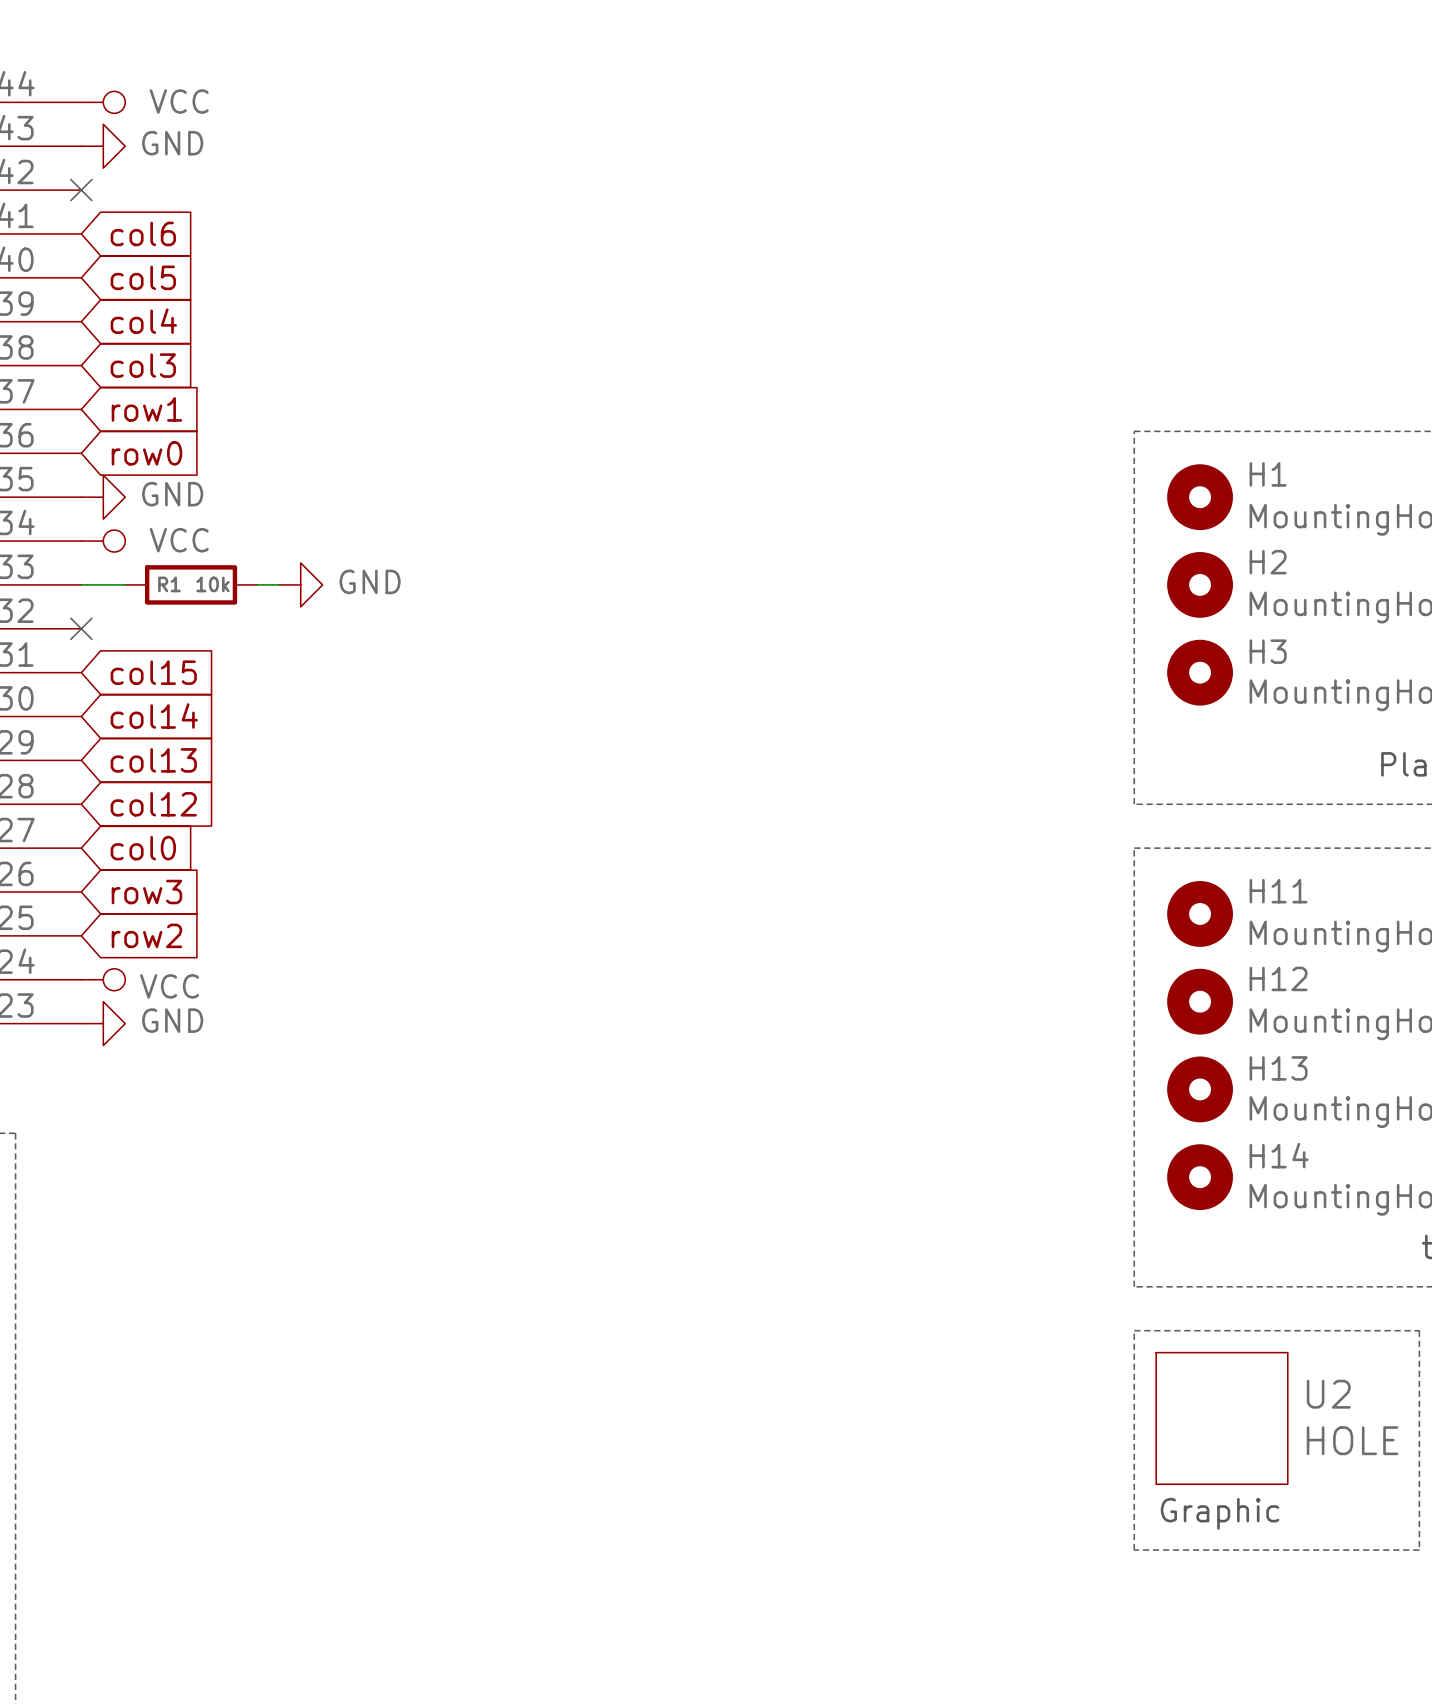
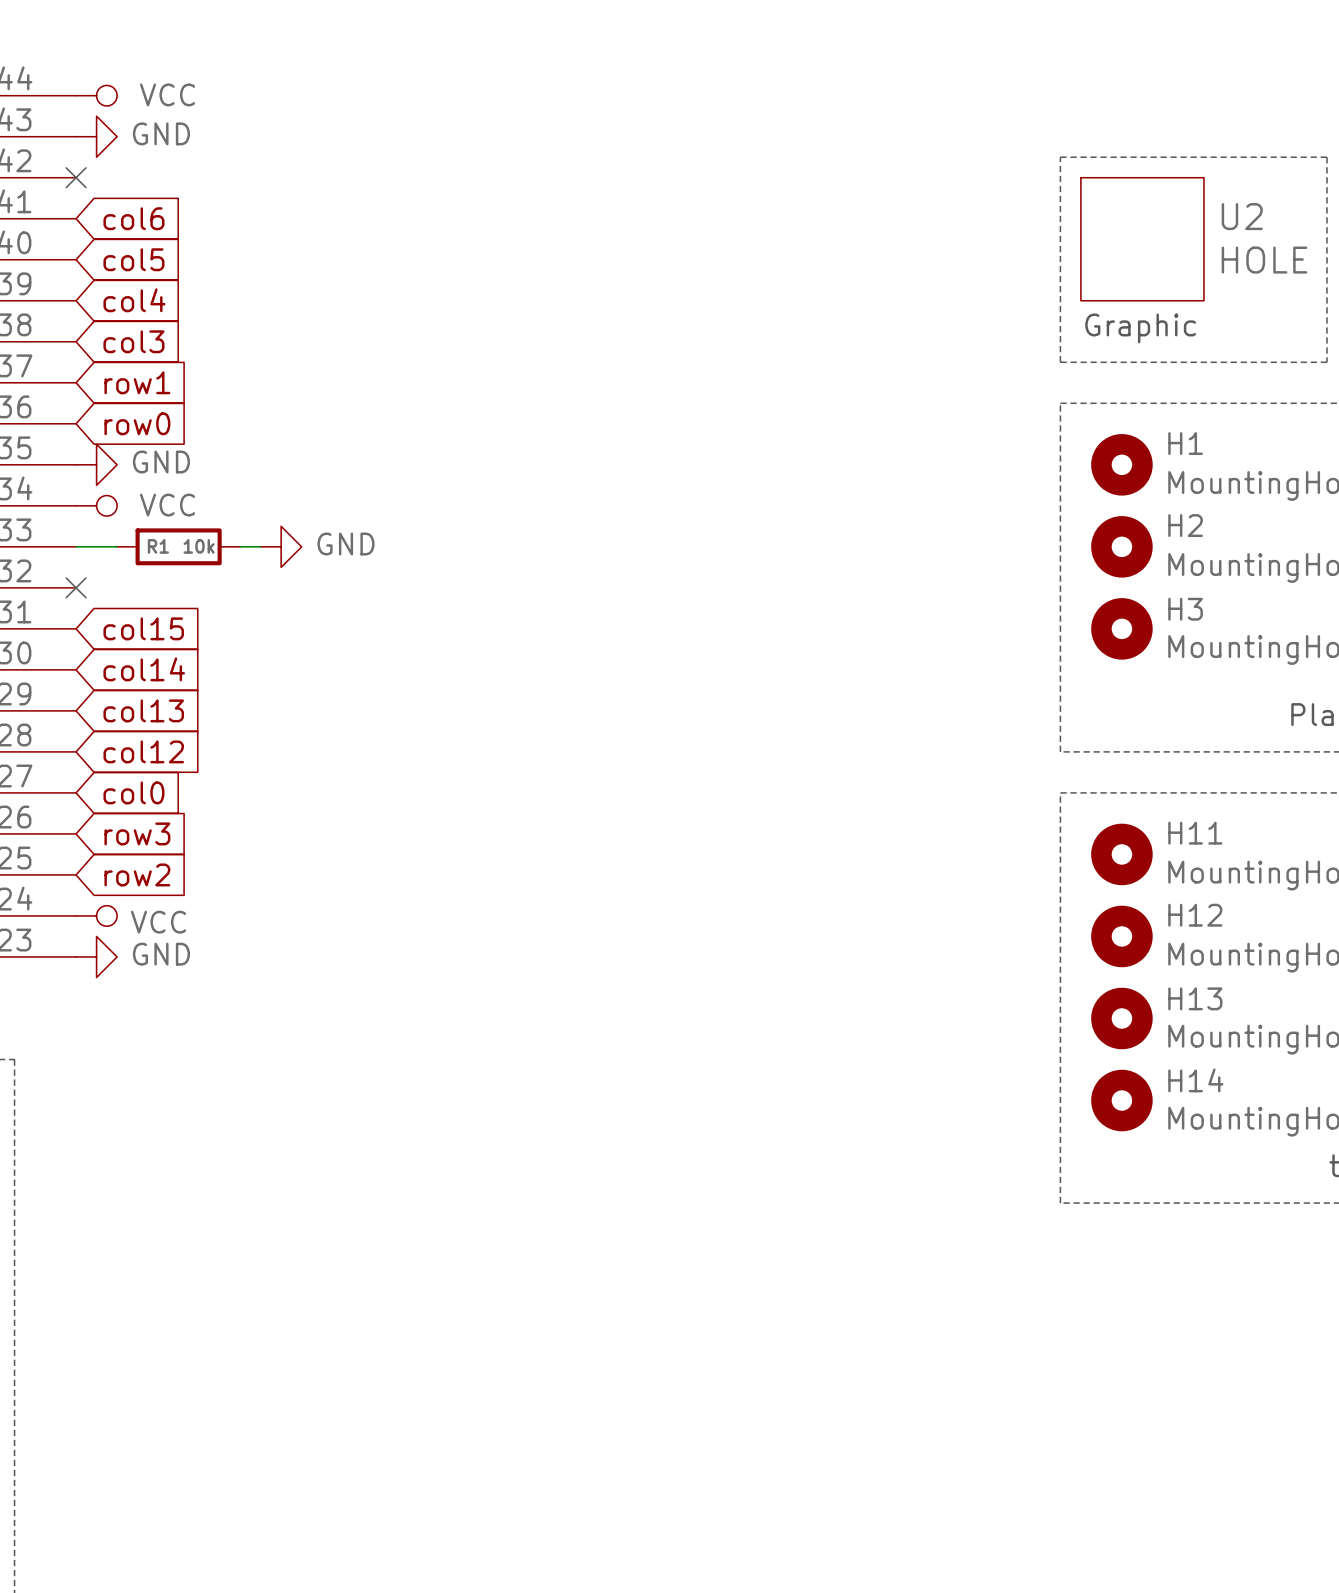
line: none -> (1060, 157) (1060, 362) (1326, 362) (1326, 157) (1060, 157)
text: none -> Graphic (1140, 328)
line: (1134, 1330) (1134, 1550) (1419, 1550) (1419, 1330) (1134, 1330) -> none
U2 position: (1221, 1418) -> (1142, 239)
text: Graphic (1220, 1513) -> none

